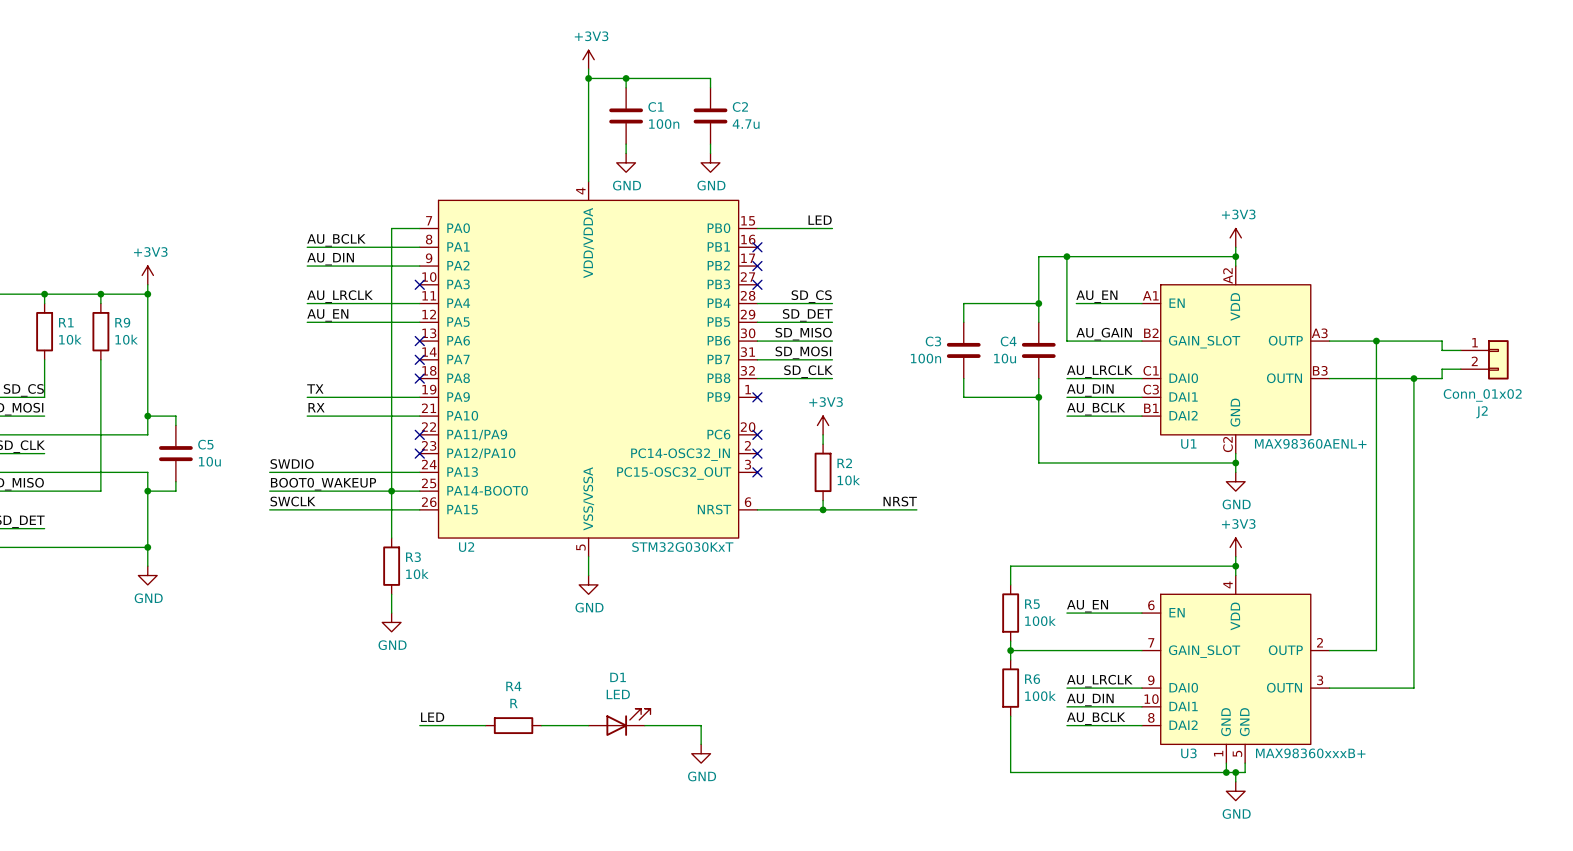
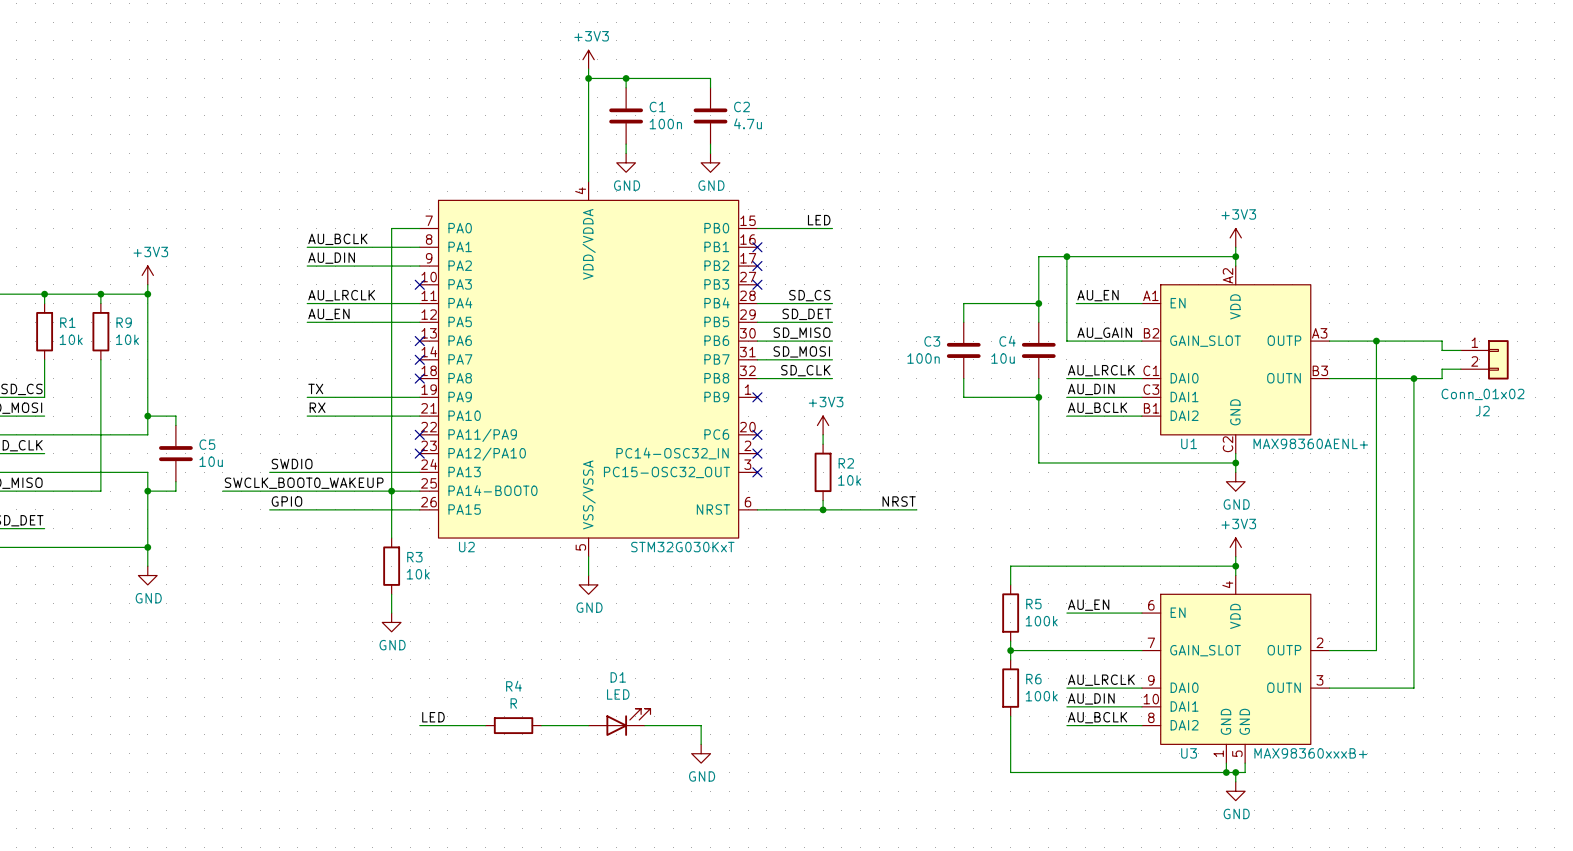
label: BOOT0_WAKEUP (323, 484) -> SWCLK_BOOT0_WAKEUP (304, 483)
wire: none -> (222, 491) (269, 491)
label: SWCLK (293, 501) -> GPIO (286, 501)

